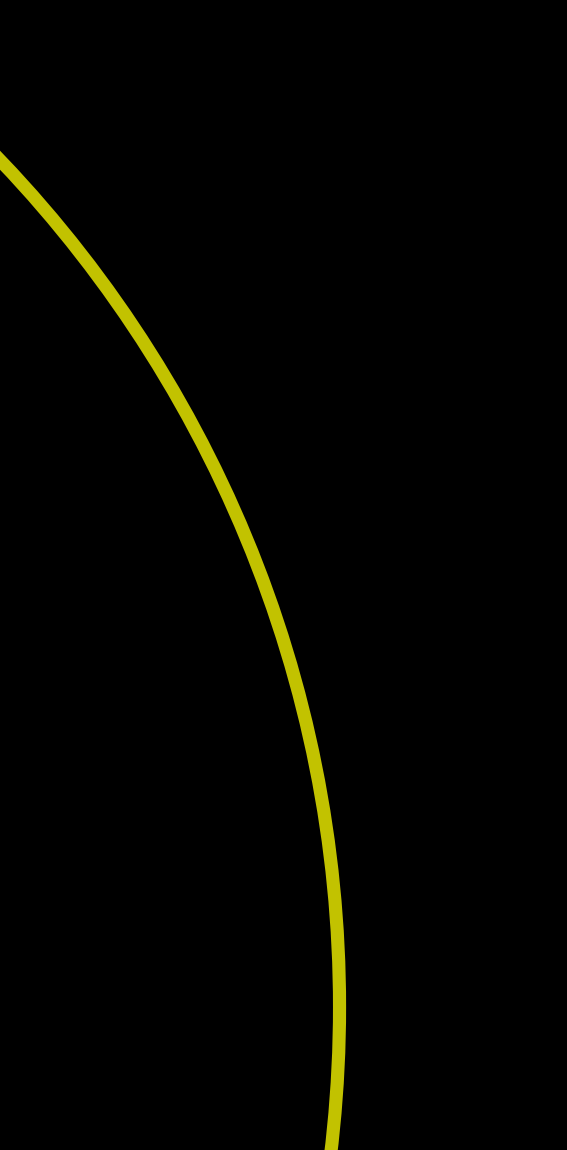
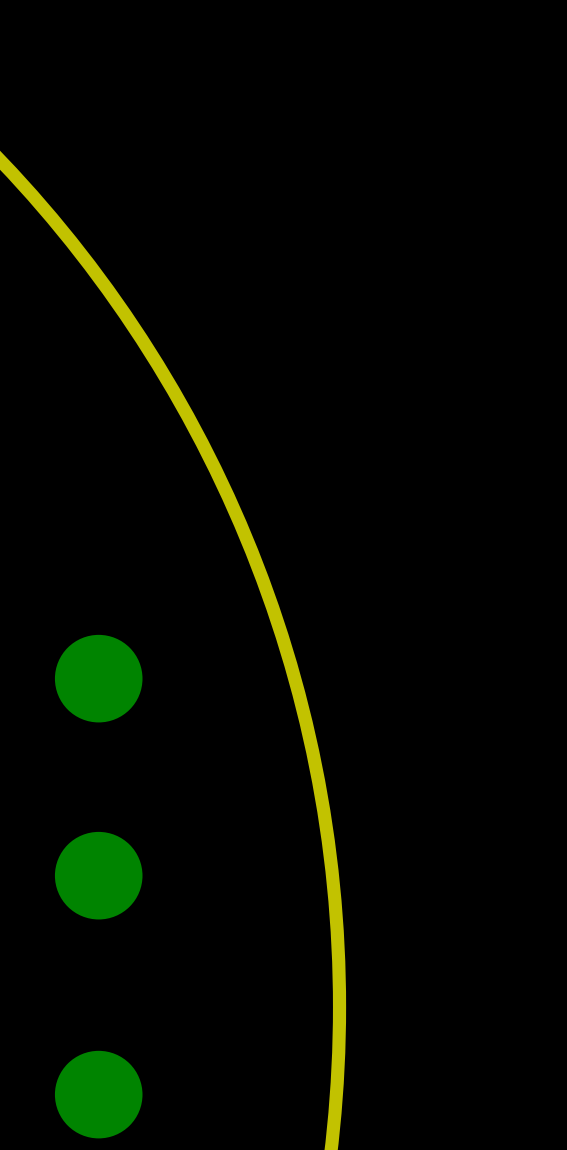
part: none -> (98, 678)
part: none -> (98, 875)
part: none -> (98, 1094)

